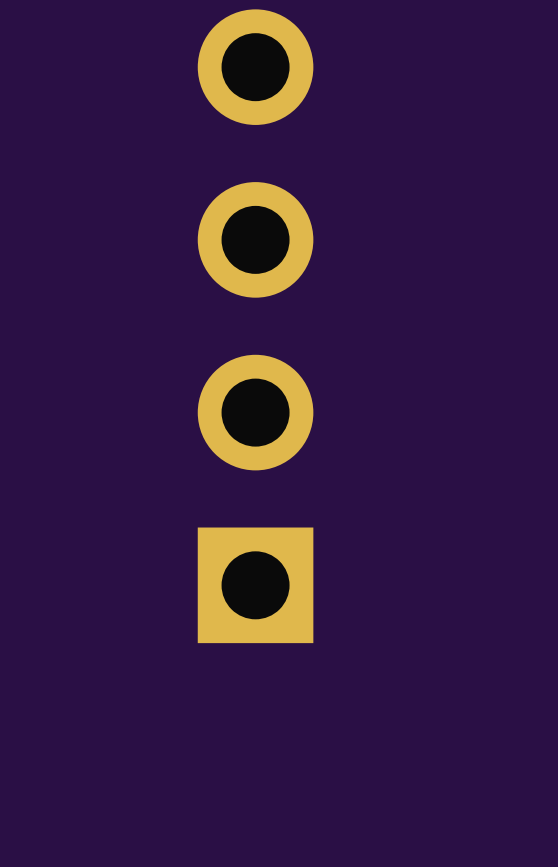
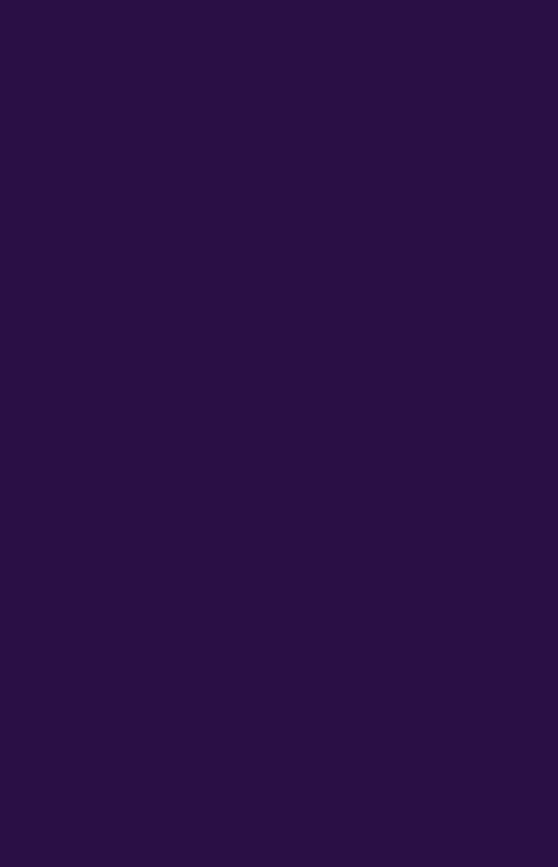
part: (255, 326) -> none

